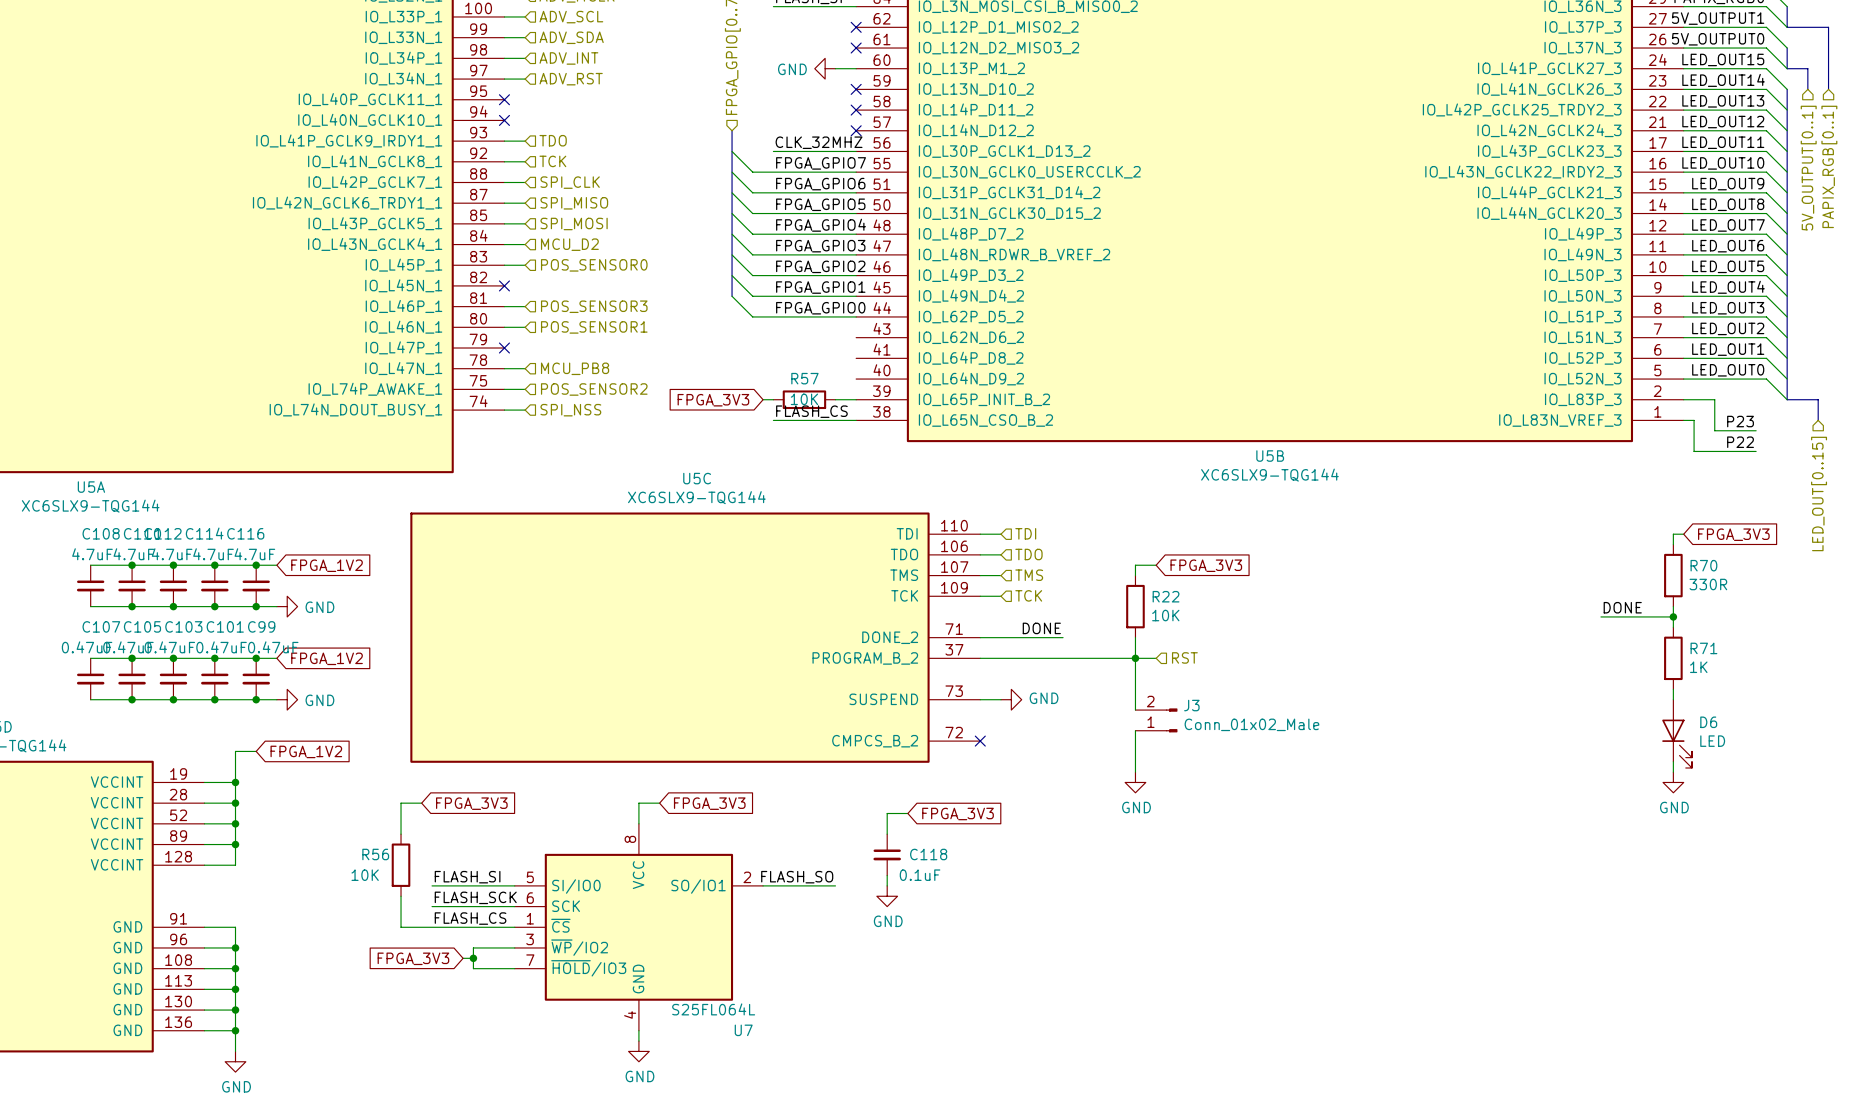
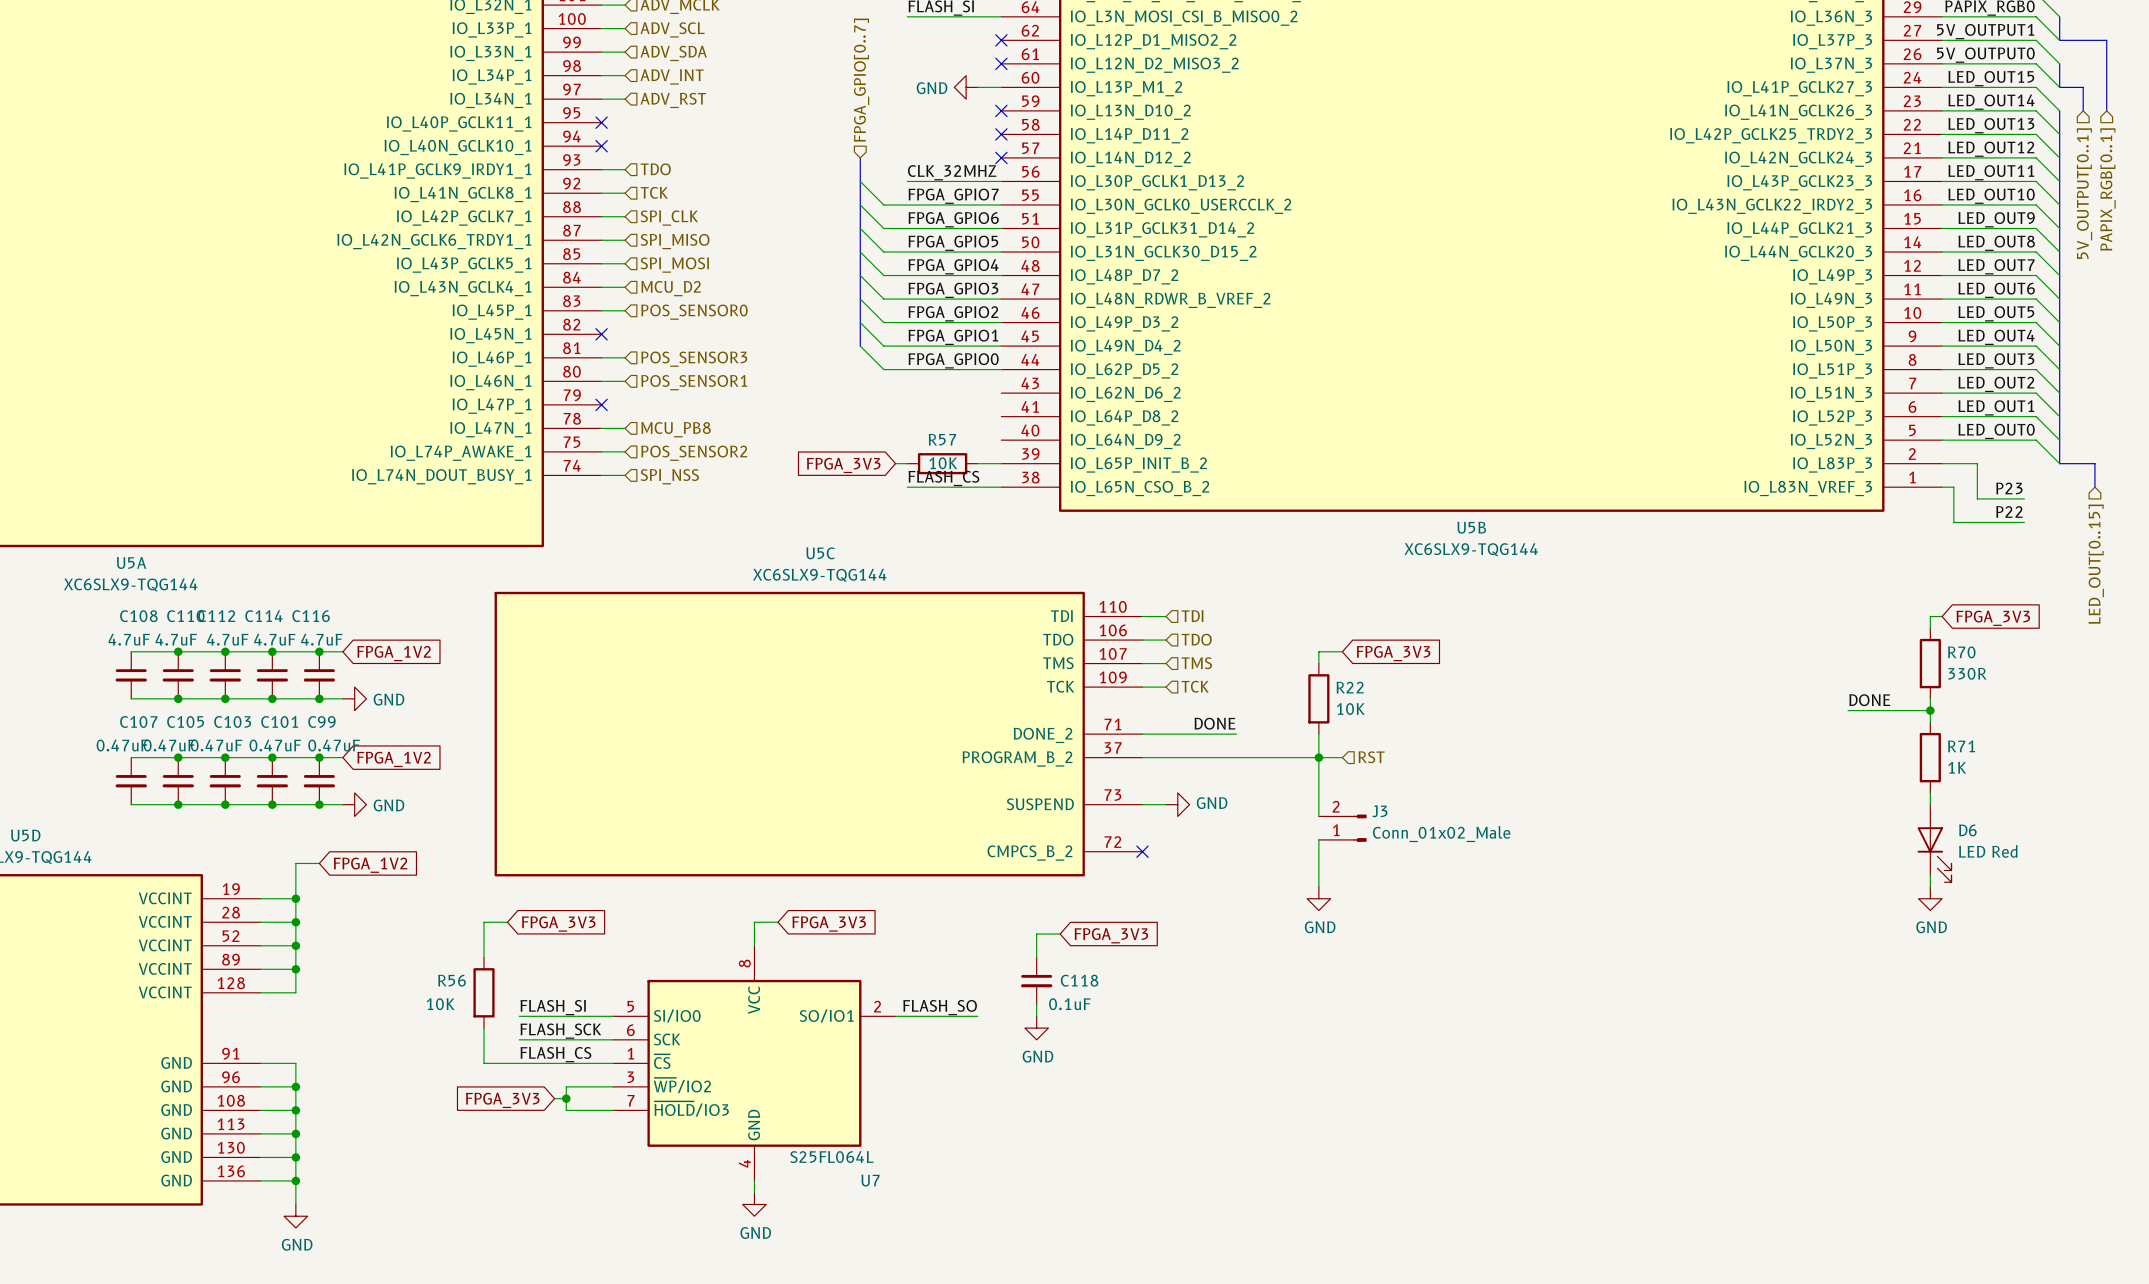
D6 value: LED (1712, 741) -> LED Red (1988, 851)

